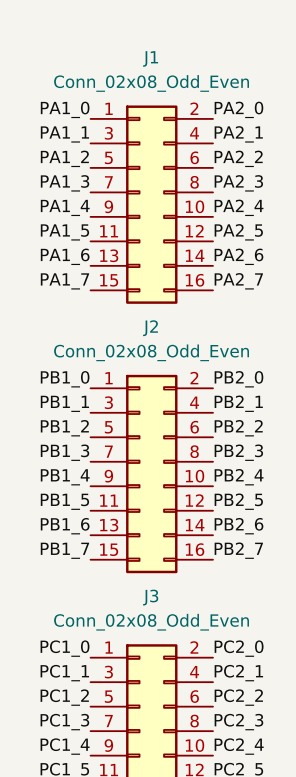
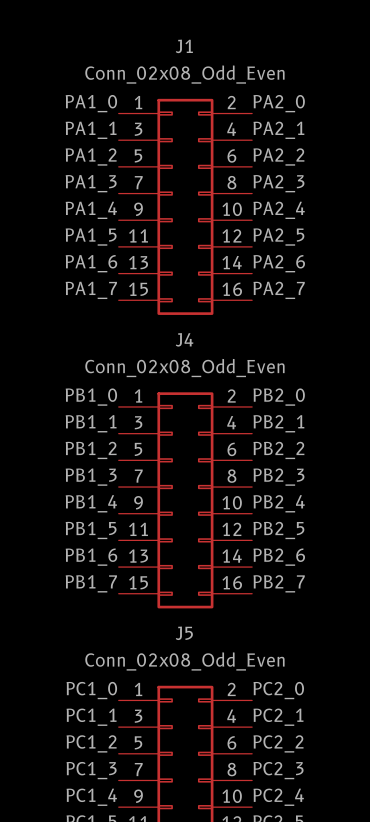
J2 name: J2 (150, 328) -> J4 (184, 339)
J3 name: J3 (150, 597) -> J5 (184, 633)

